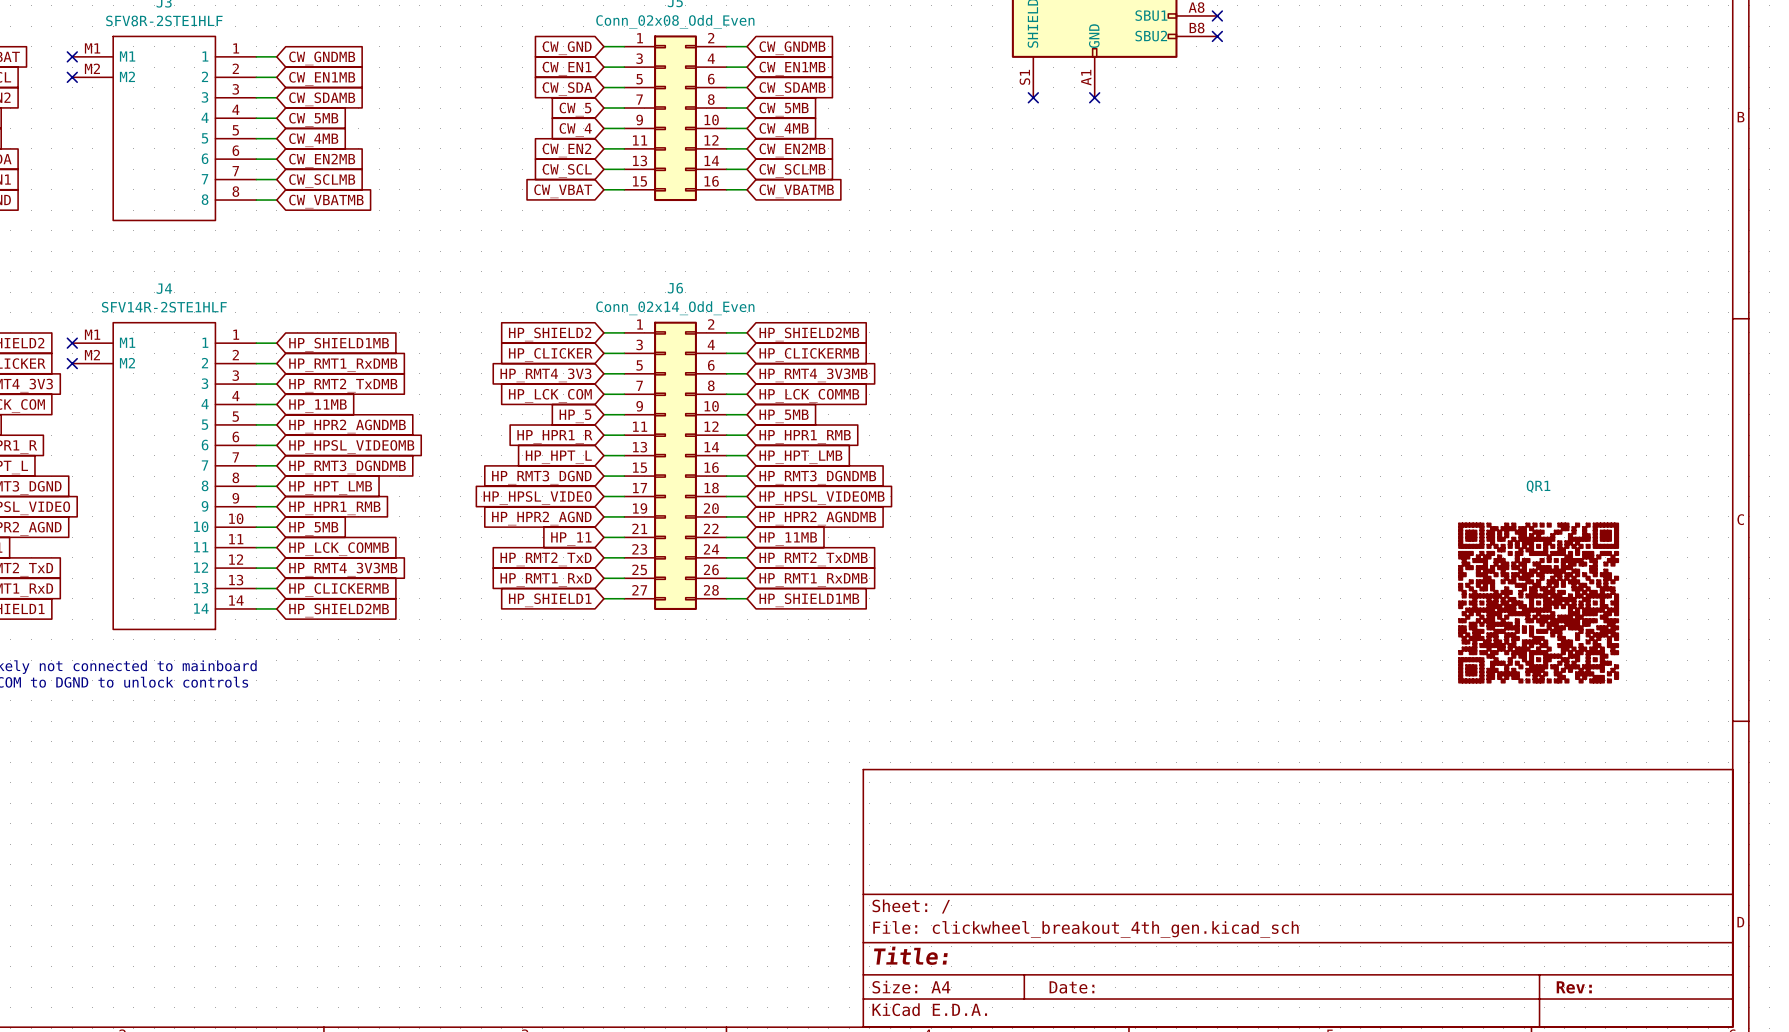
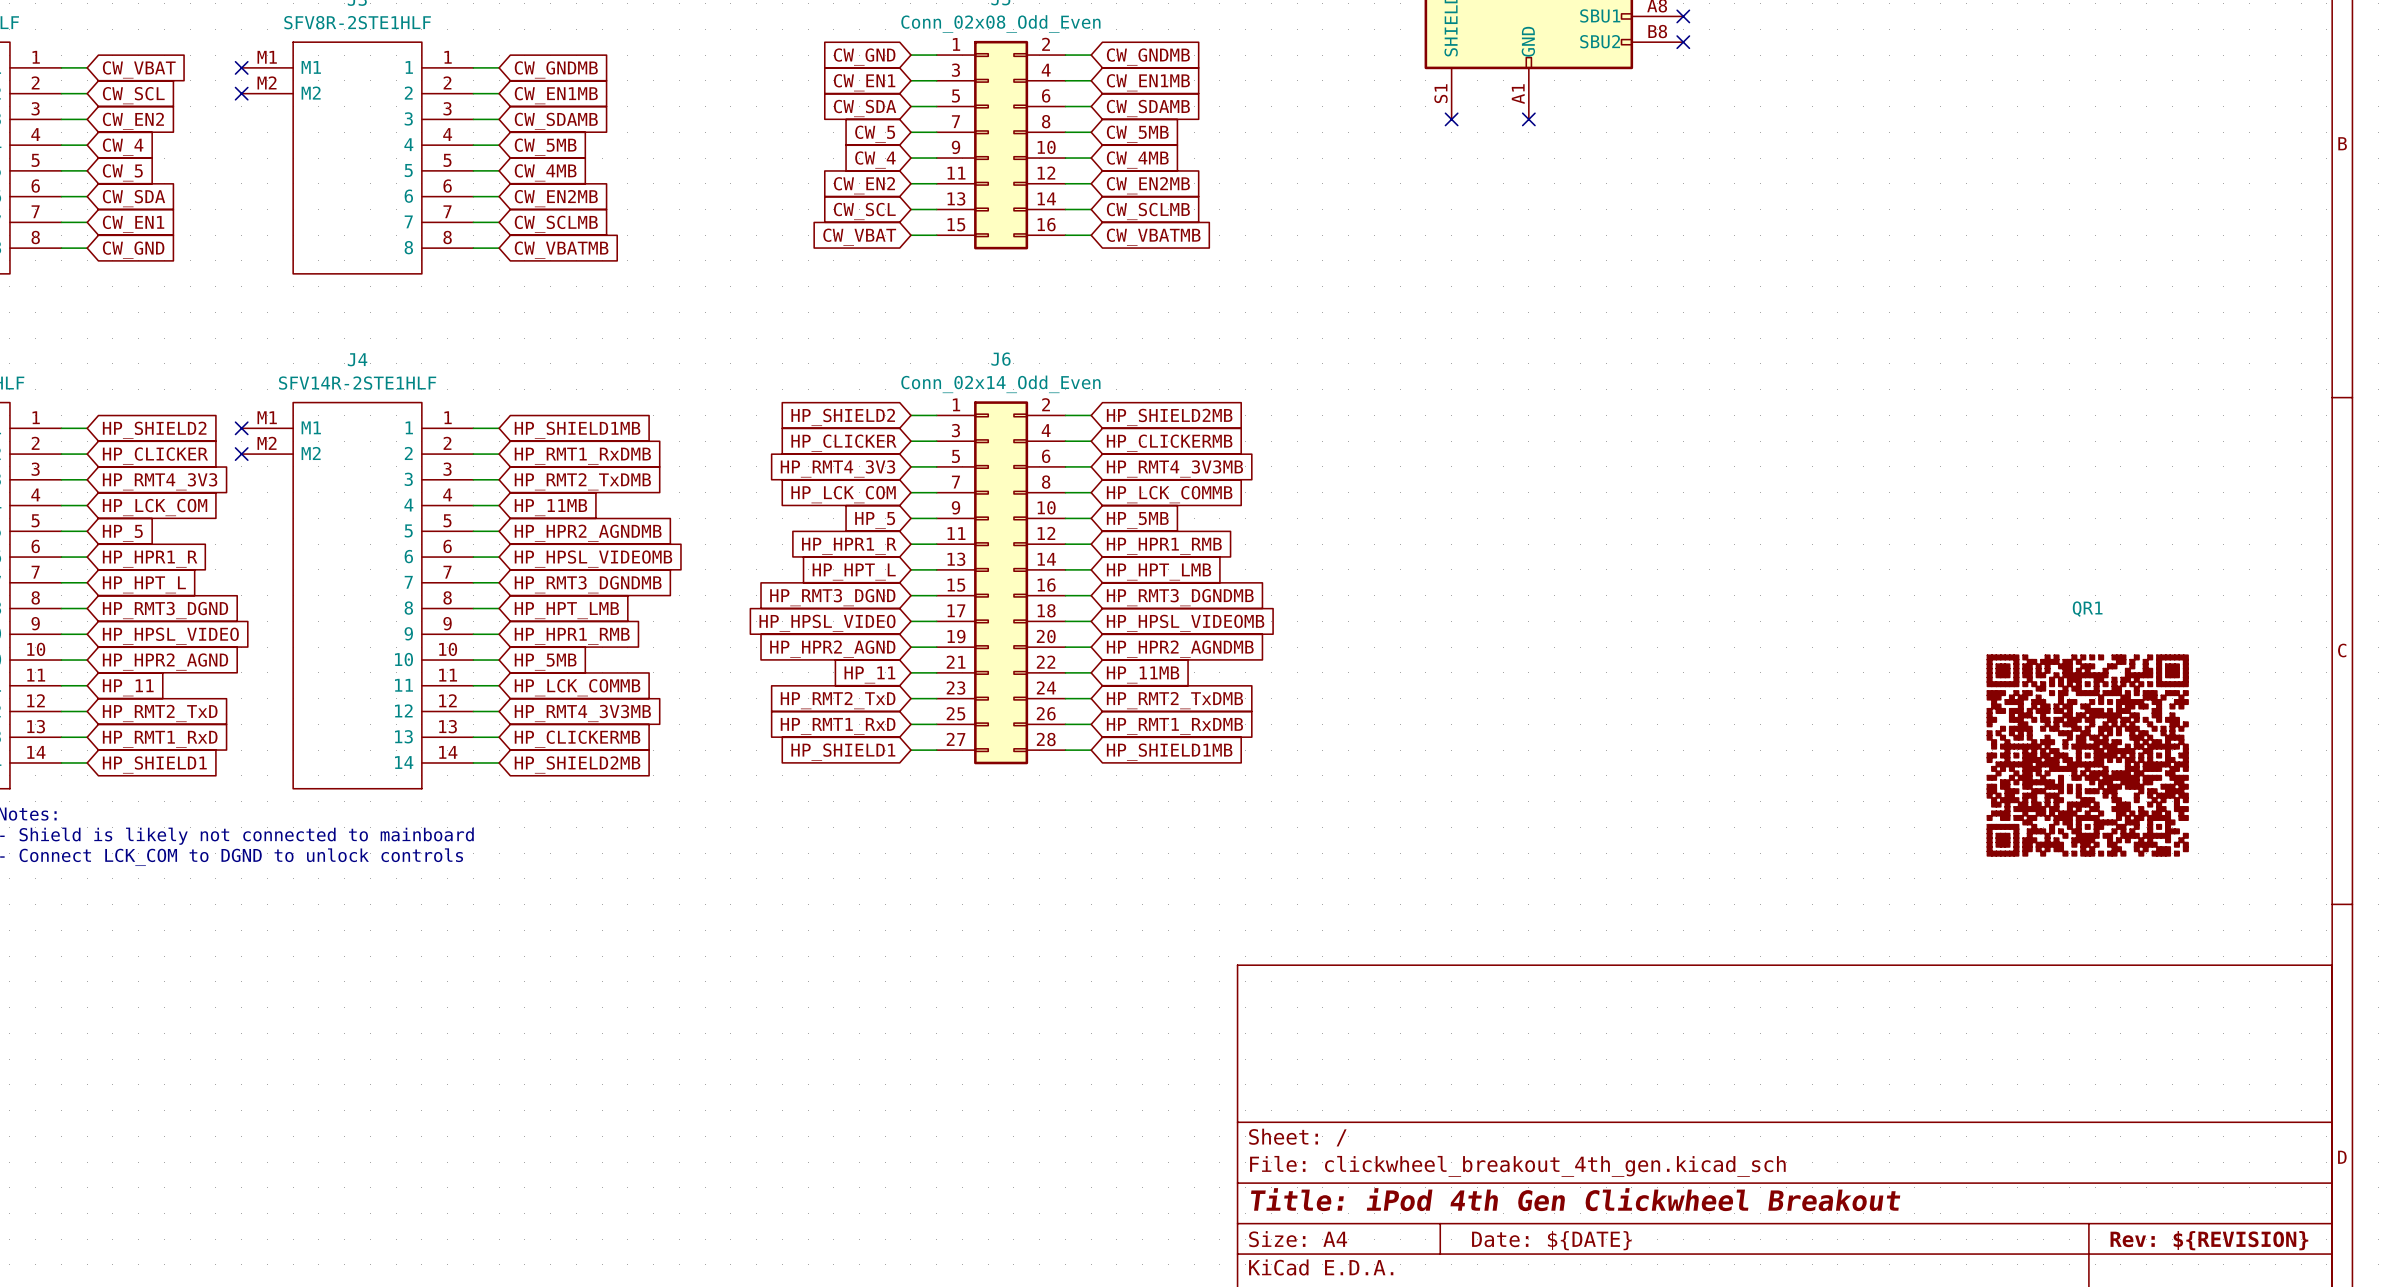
title block: Title: (910, 955) -> Title: iPod 4th Gen Clickwheel Breakout (1575, 1199)
title block: Date: (1071, 987) -> Date: ${DATE} (1551, 1240)
title block: Rev: (1574, 987) -> Rev: ${REVISION} (2209, 1240)

